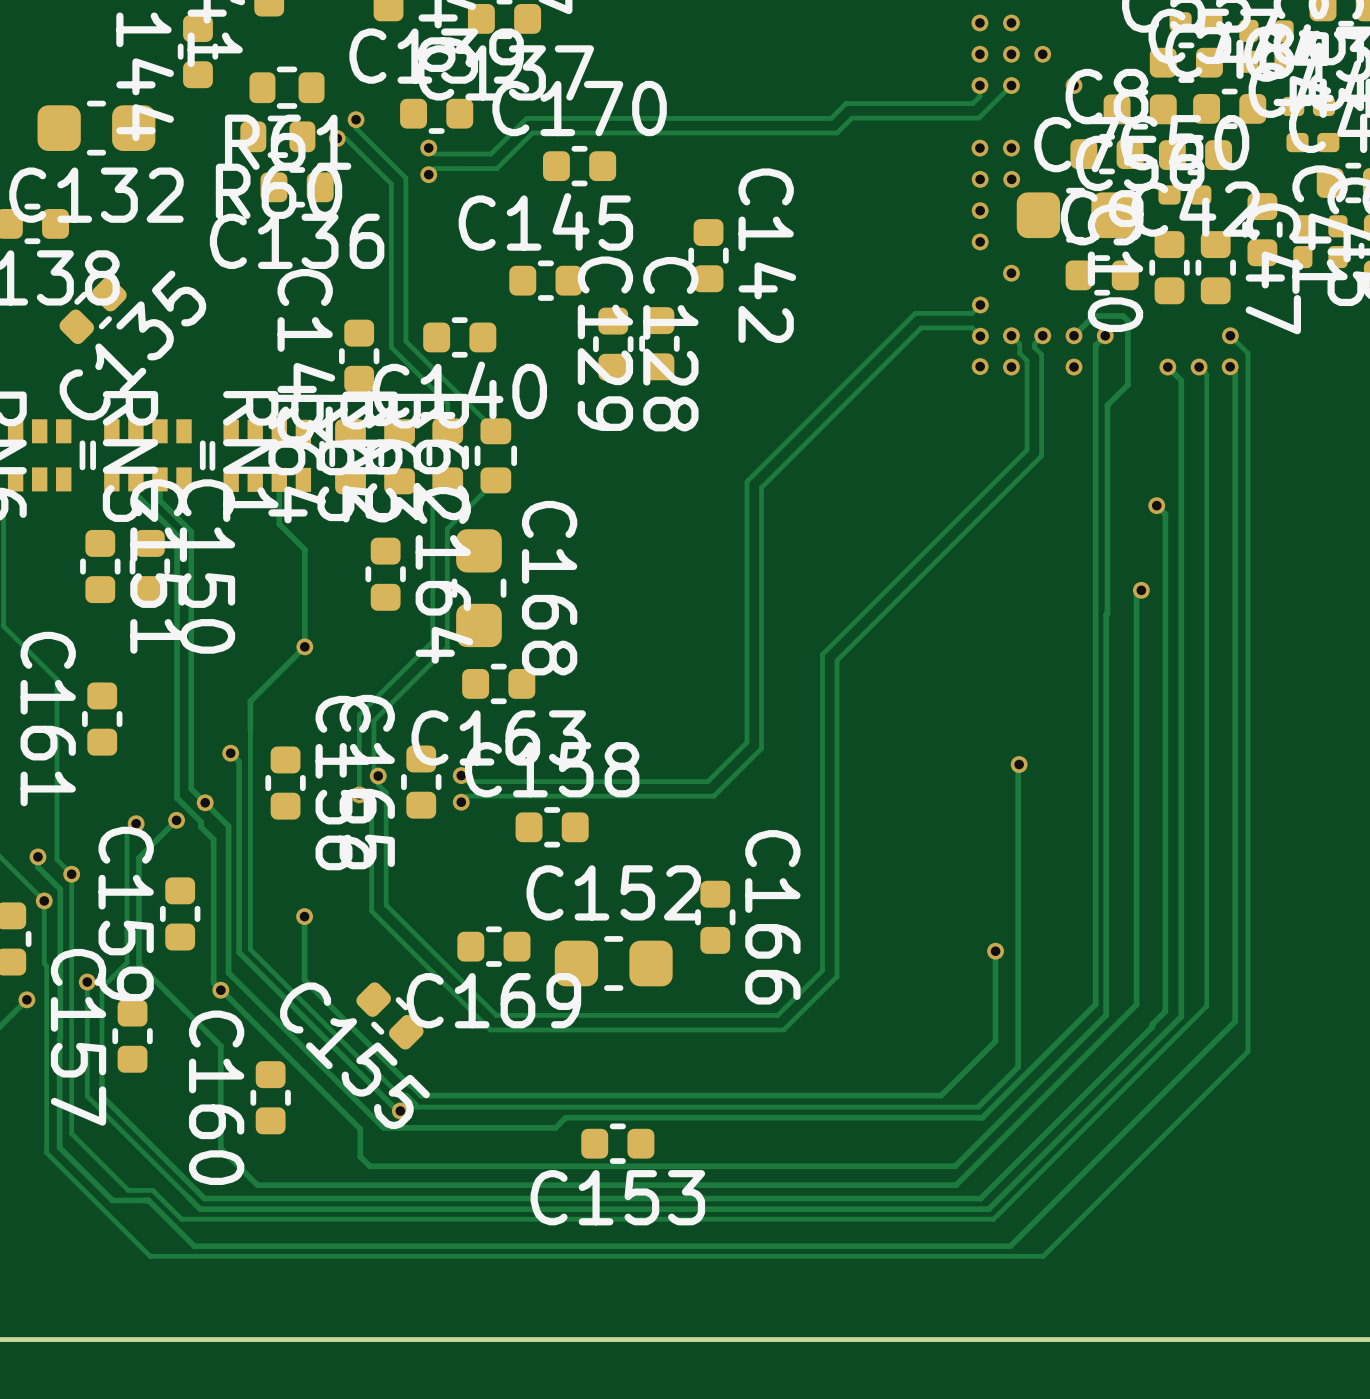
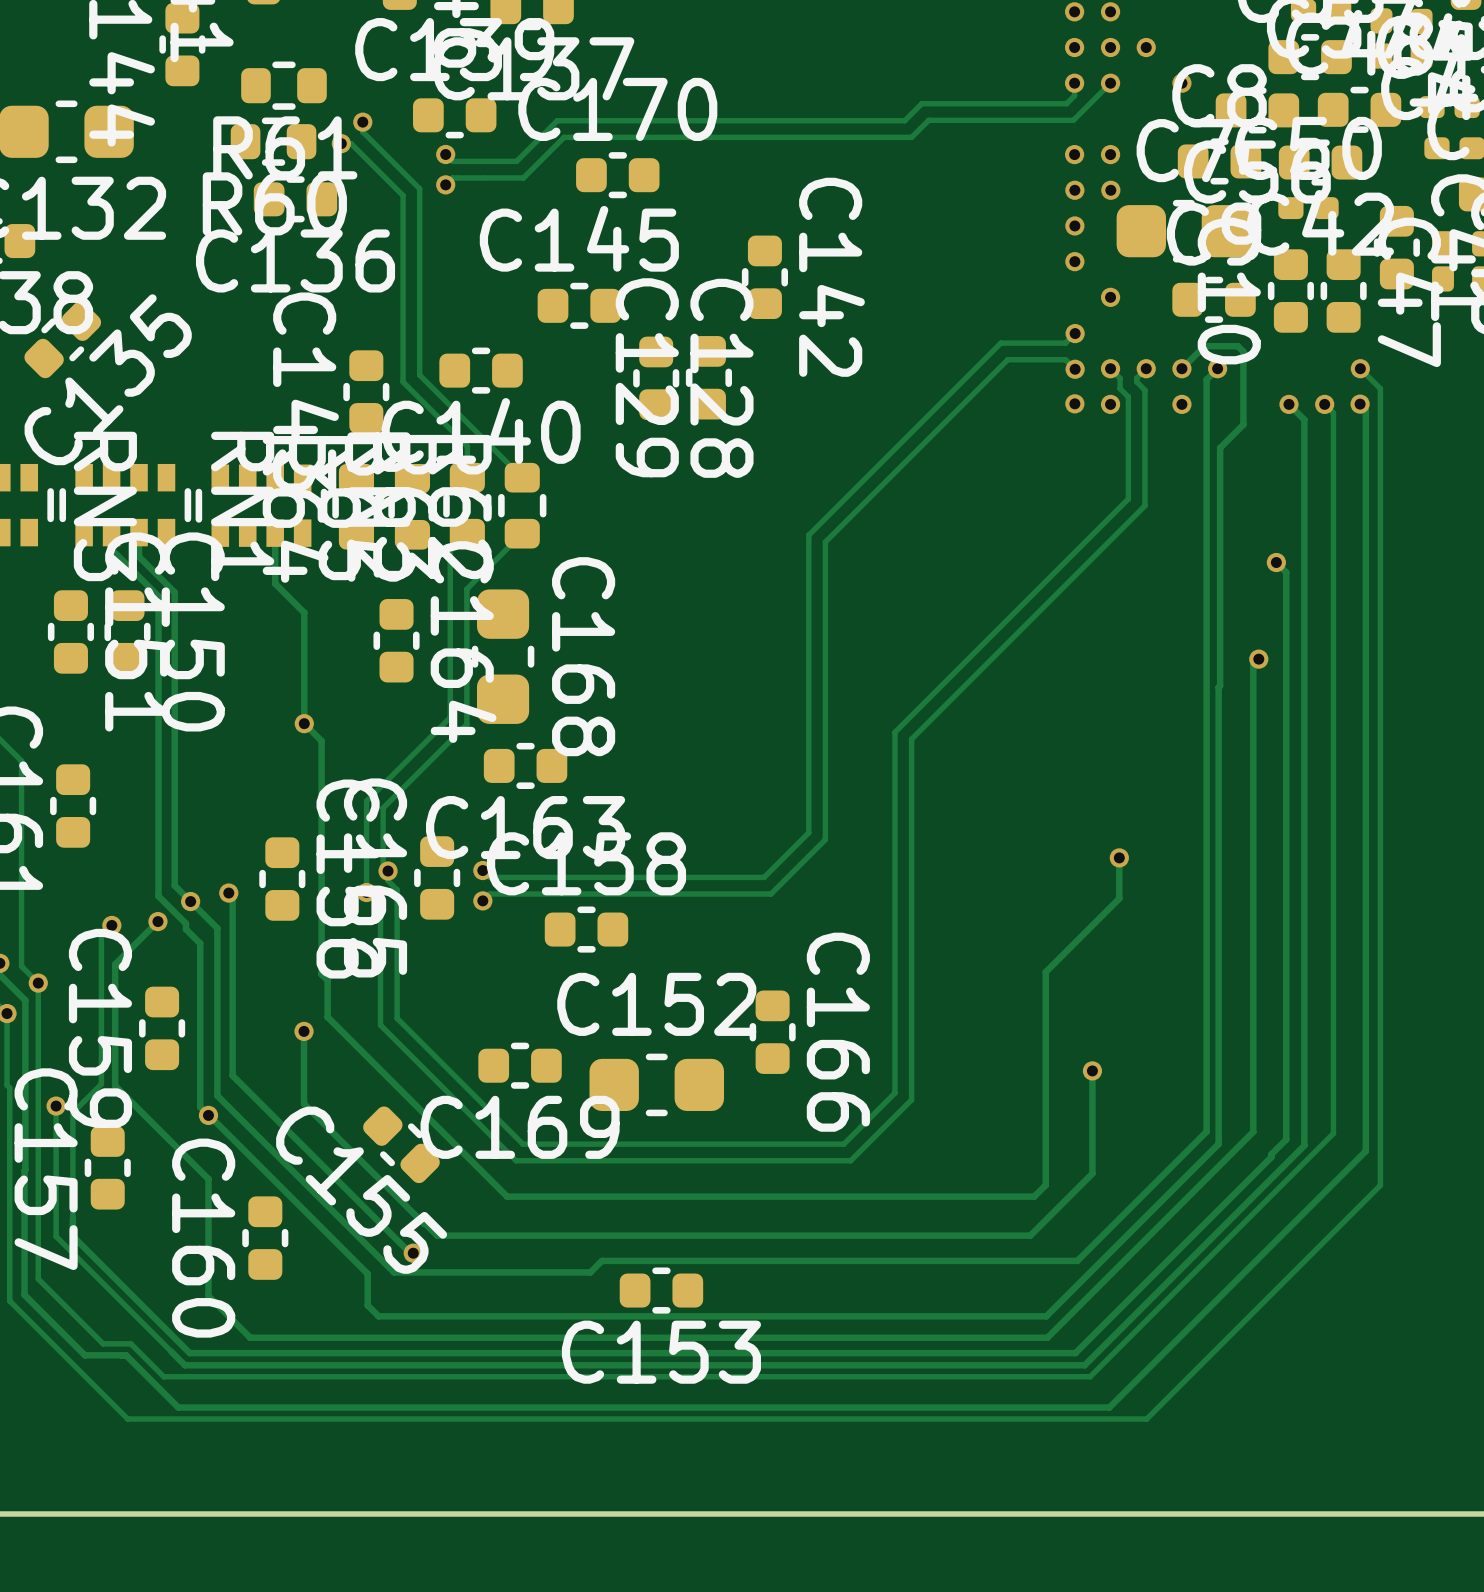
track: (304, 646) (250, 701) (250, 949) (372, 1071) (375, 1071) (399, 1095) (406, 1095) (415, 1104) (415, 1107) (978, 1107) -> (304, 723) (321, 740) (321, 974) (327, 980) (327, 1017) (507, 1196) (1034, 1196) (1045, 1185) (1045, 972) (1119, 898) (1119, 857)
track: (230, 753) (239, 761) (239, 952) (242, 955) -> (228, 893) (232, 896) (232, 1075)
via position: (230, 753) -> (228, 893)
track: (1019, 764) (1018, 1067) (978, 1106) -> none

